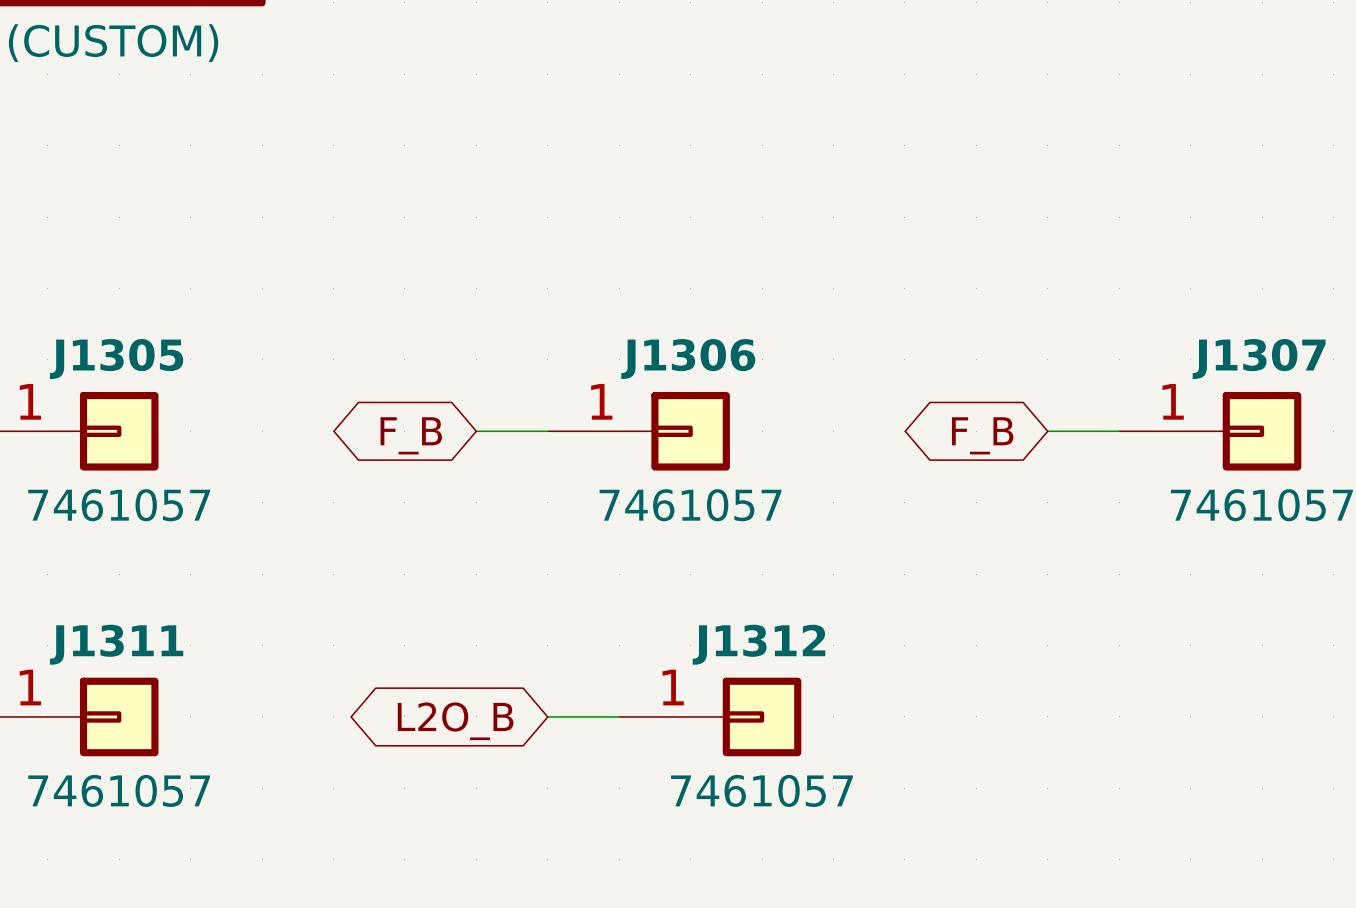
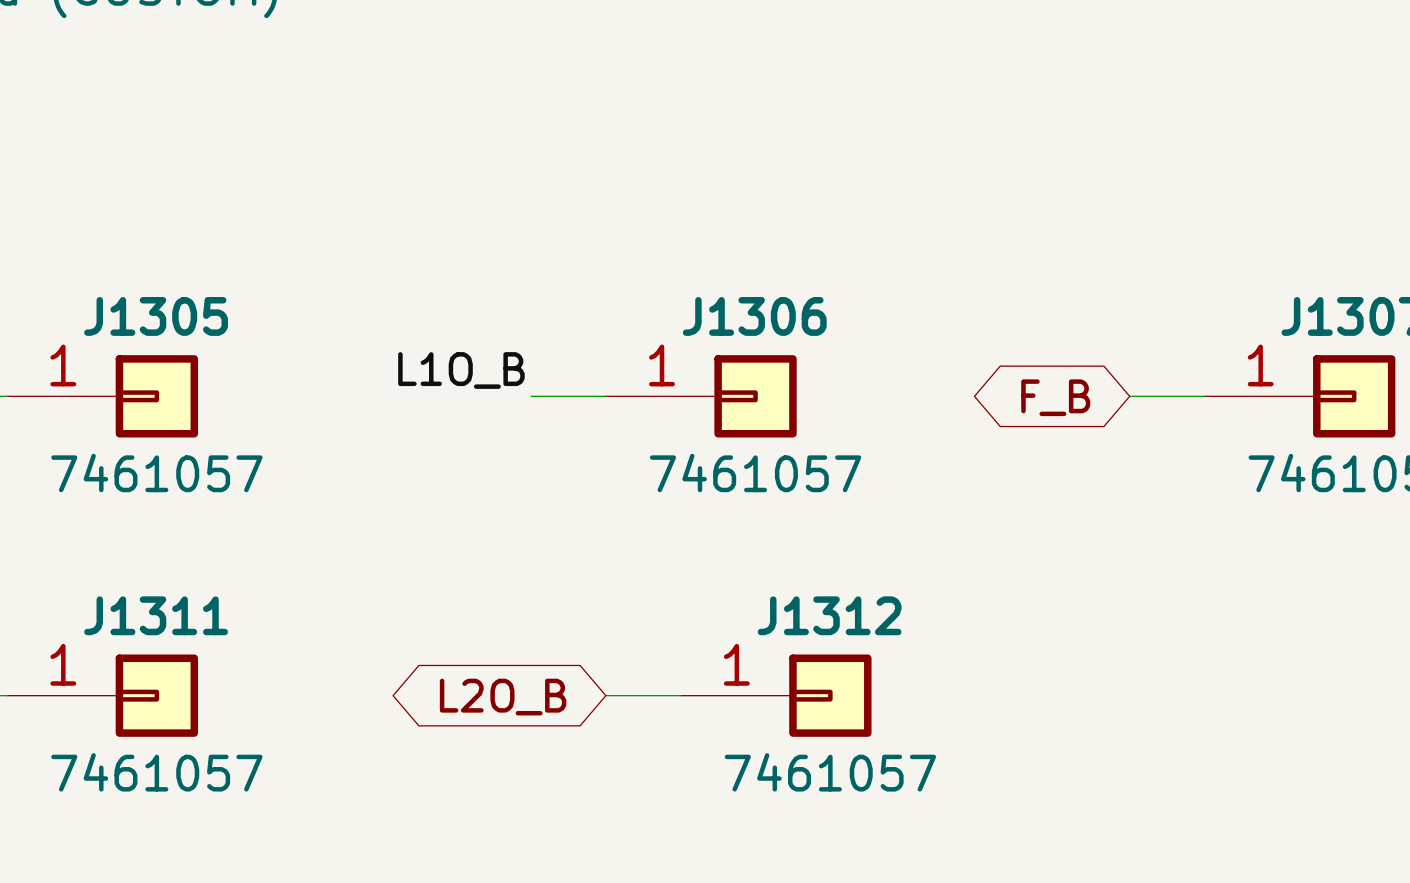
label: none -> L1O_B (461, 370)
global label: F_B (411, 435) -> none

